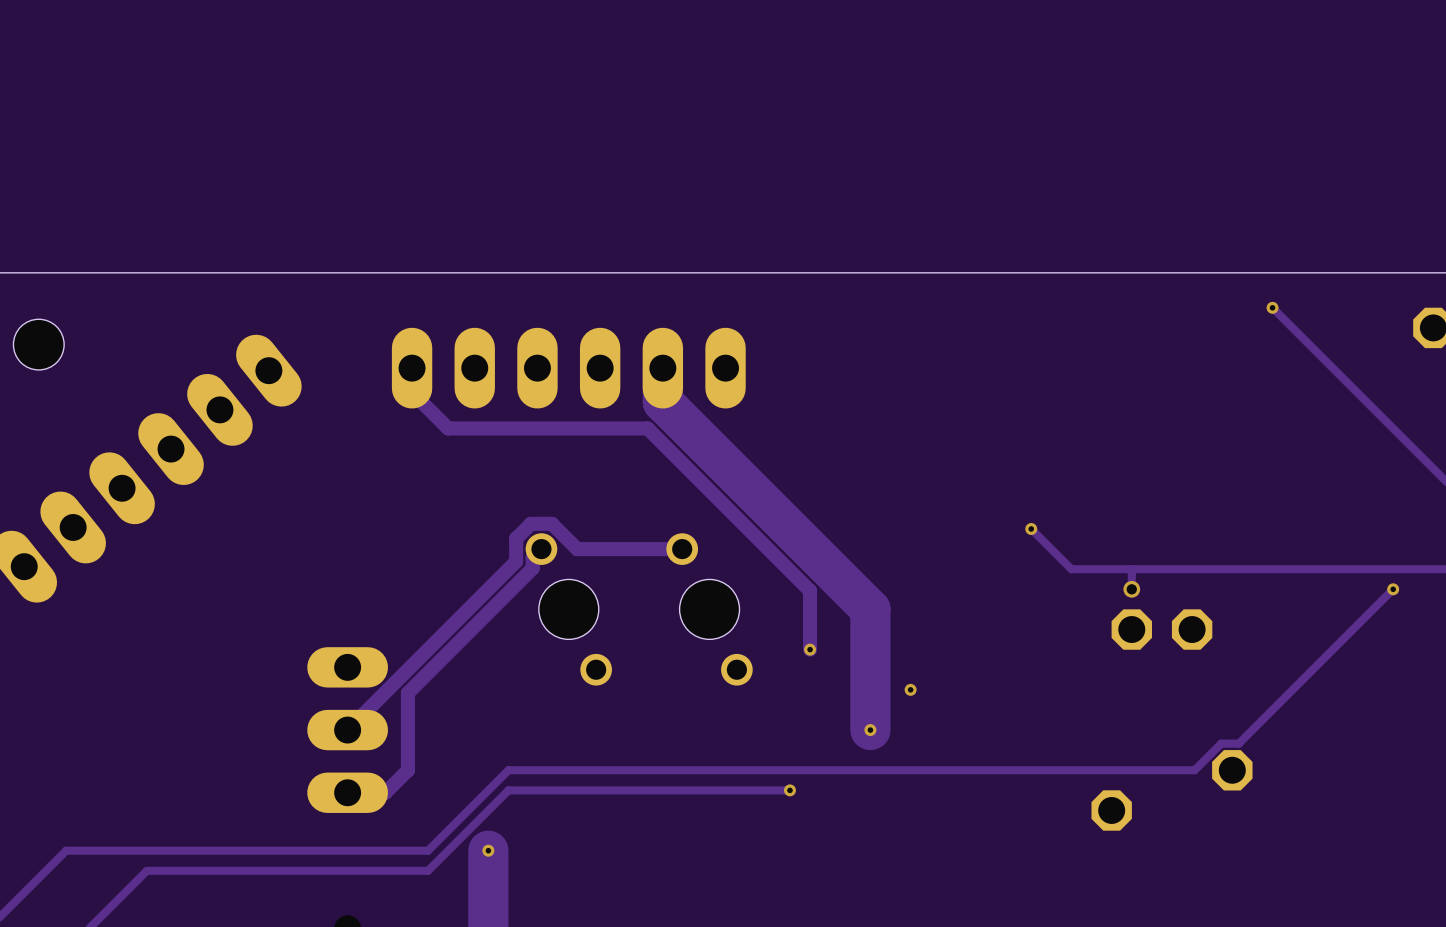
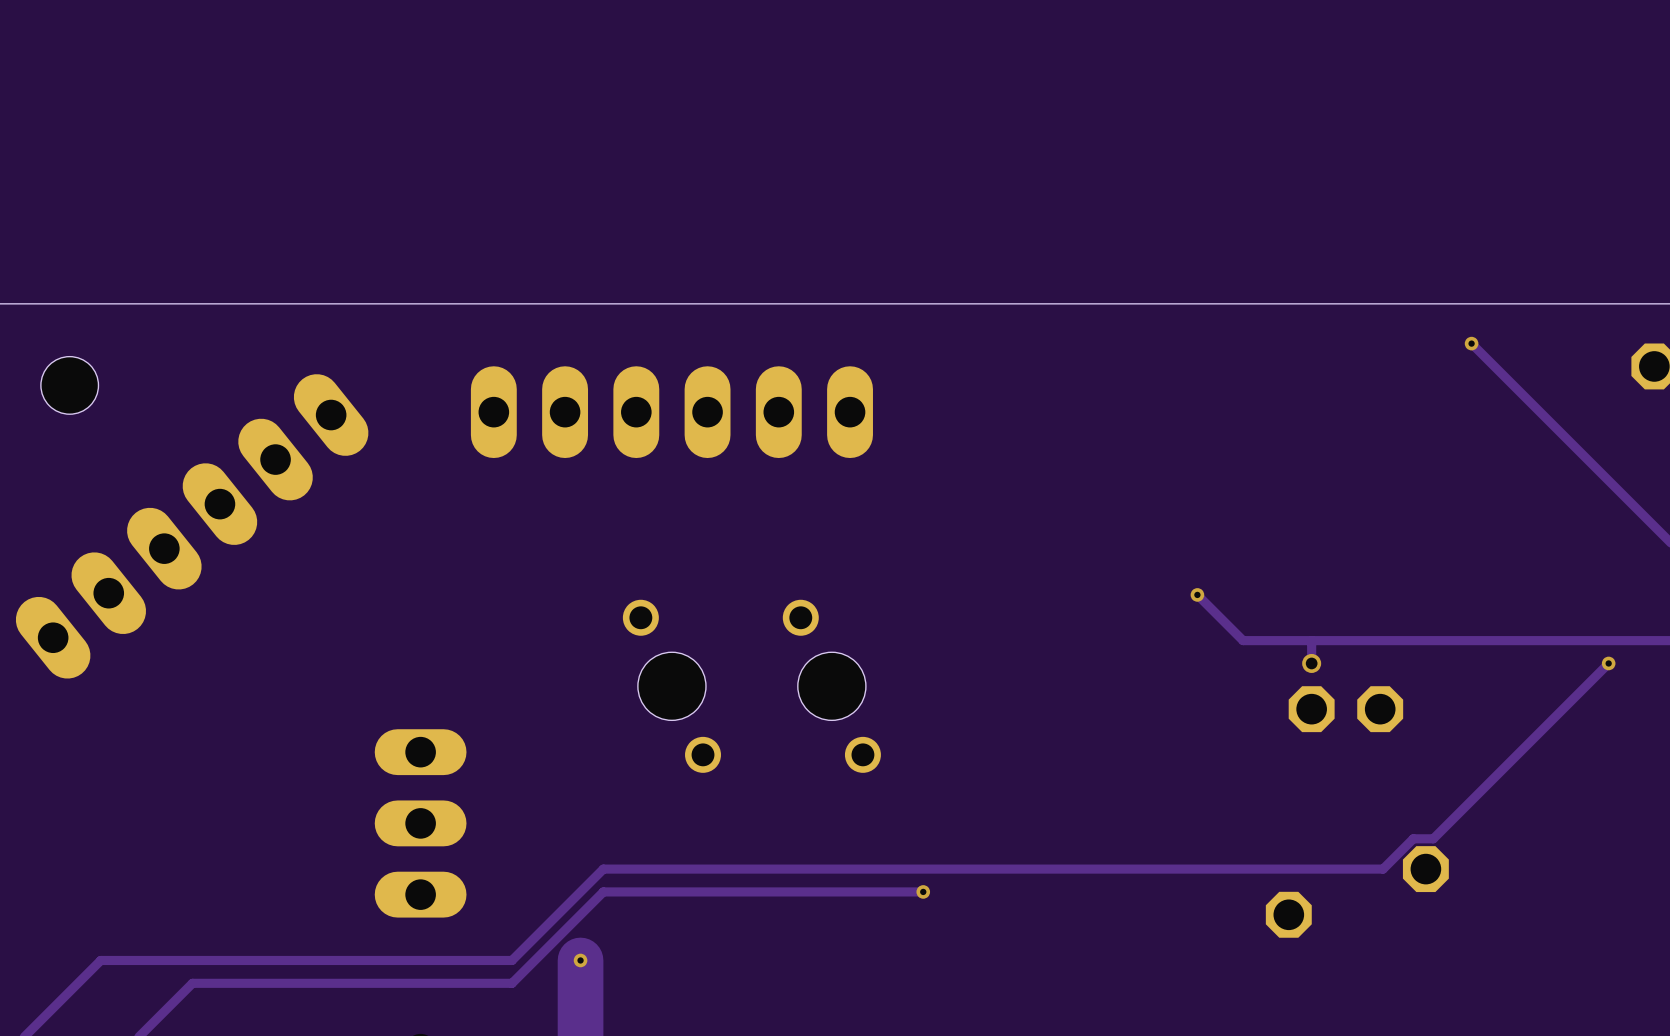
track: (407, 368) (407, 388) (448, 428) (647, 428) (810, 590) (810, 649) -> none
track: (662, 368) (662, 401) (870, 609) (870, 730) -> none
track: (541, 549) (532, 557) (532, 568) (407, 693) (407, 770) (385, 792) (347, 792) -> none
track: (682, 549) (577, 549) (551, 523) (530, 523) (516, 538) (516, 561) (347, 730) -> none
via: (810, 649) -> none
via: (910, 689) -> none
via: (870, 730) -> none

